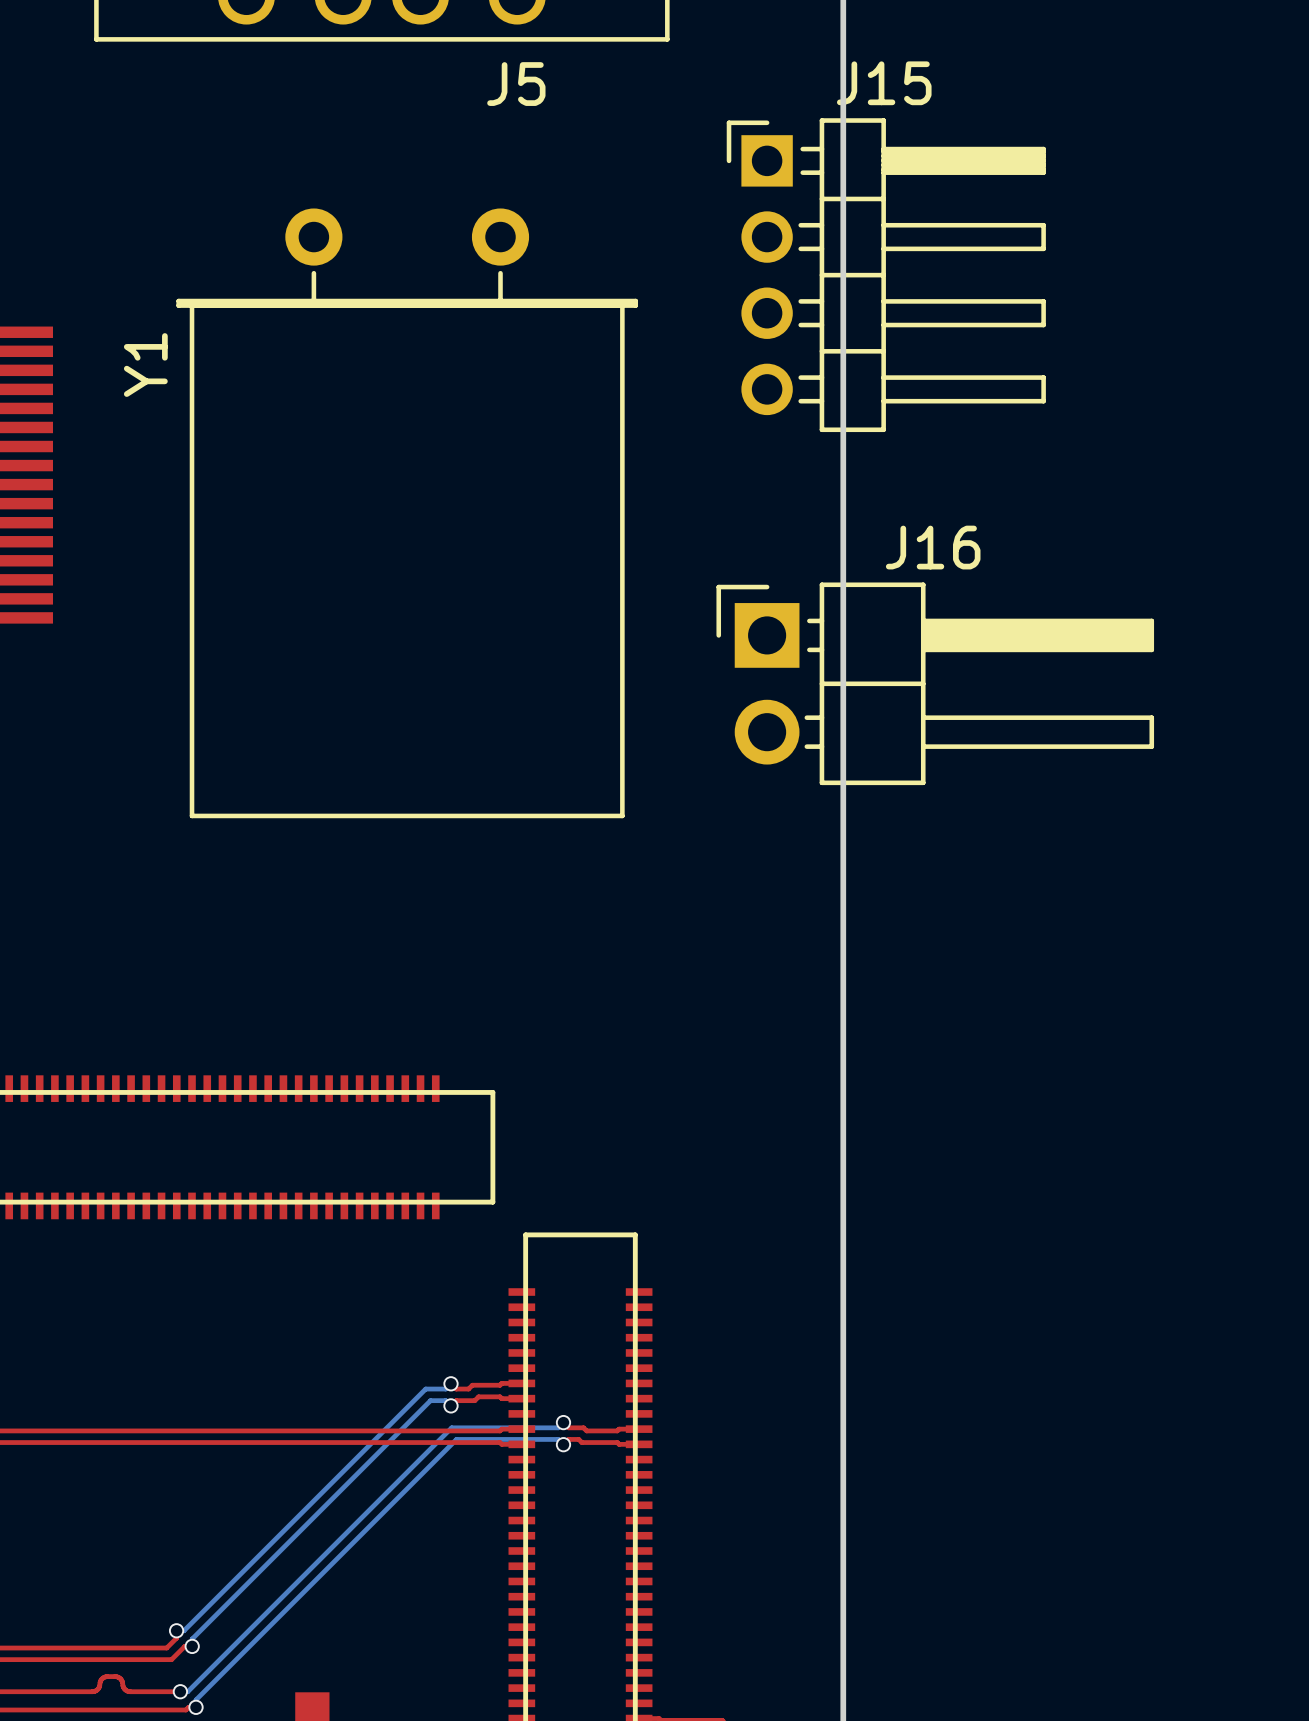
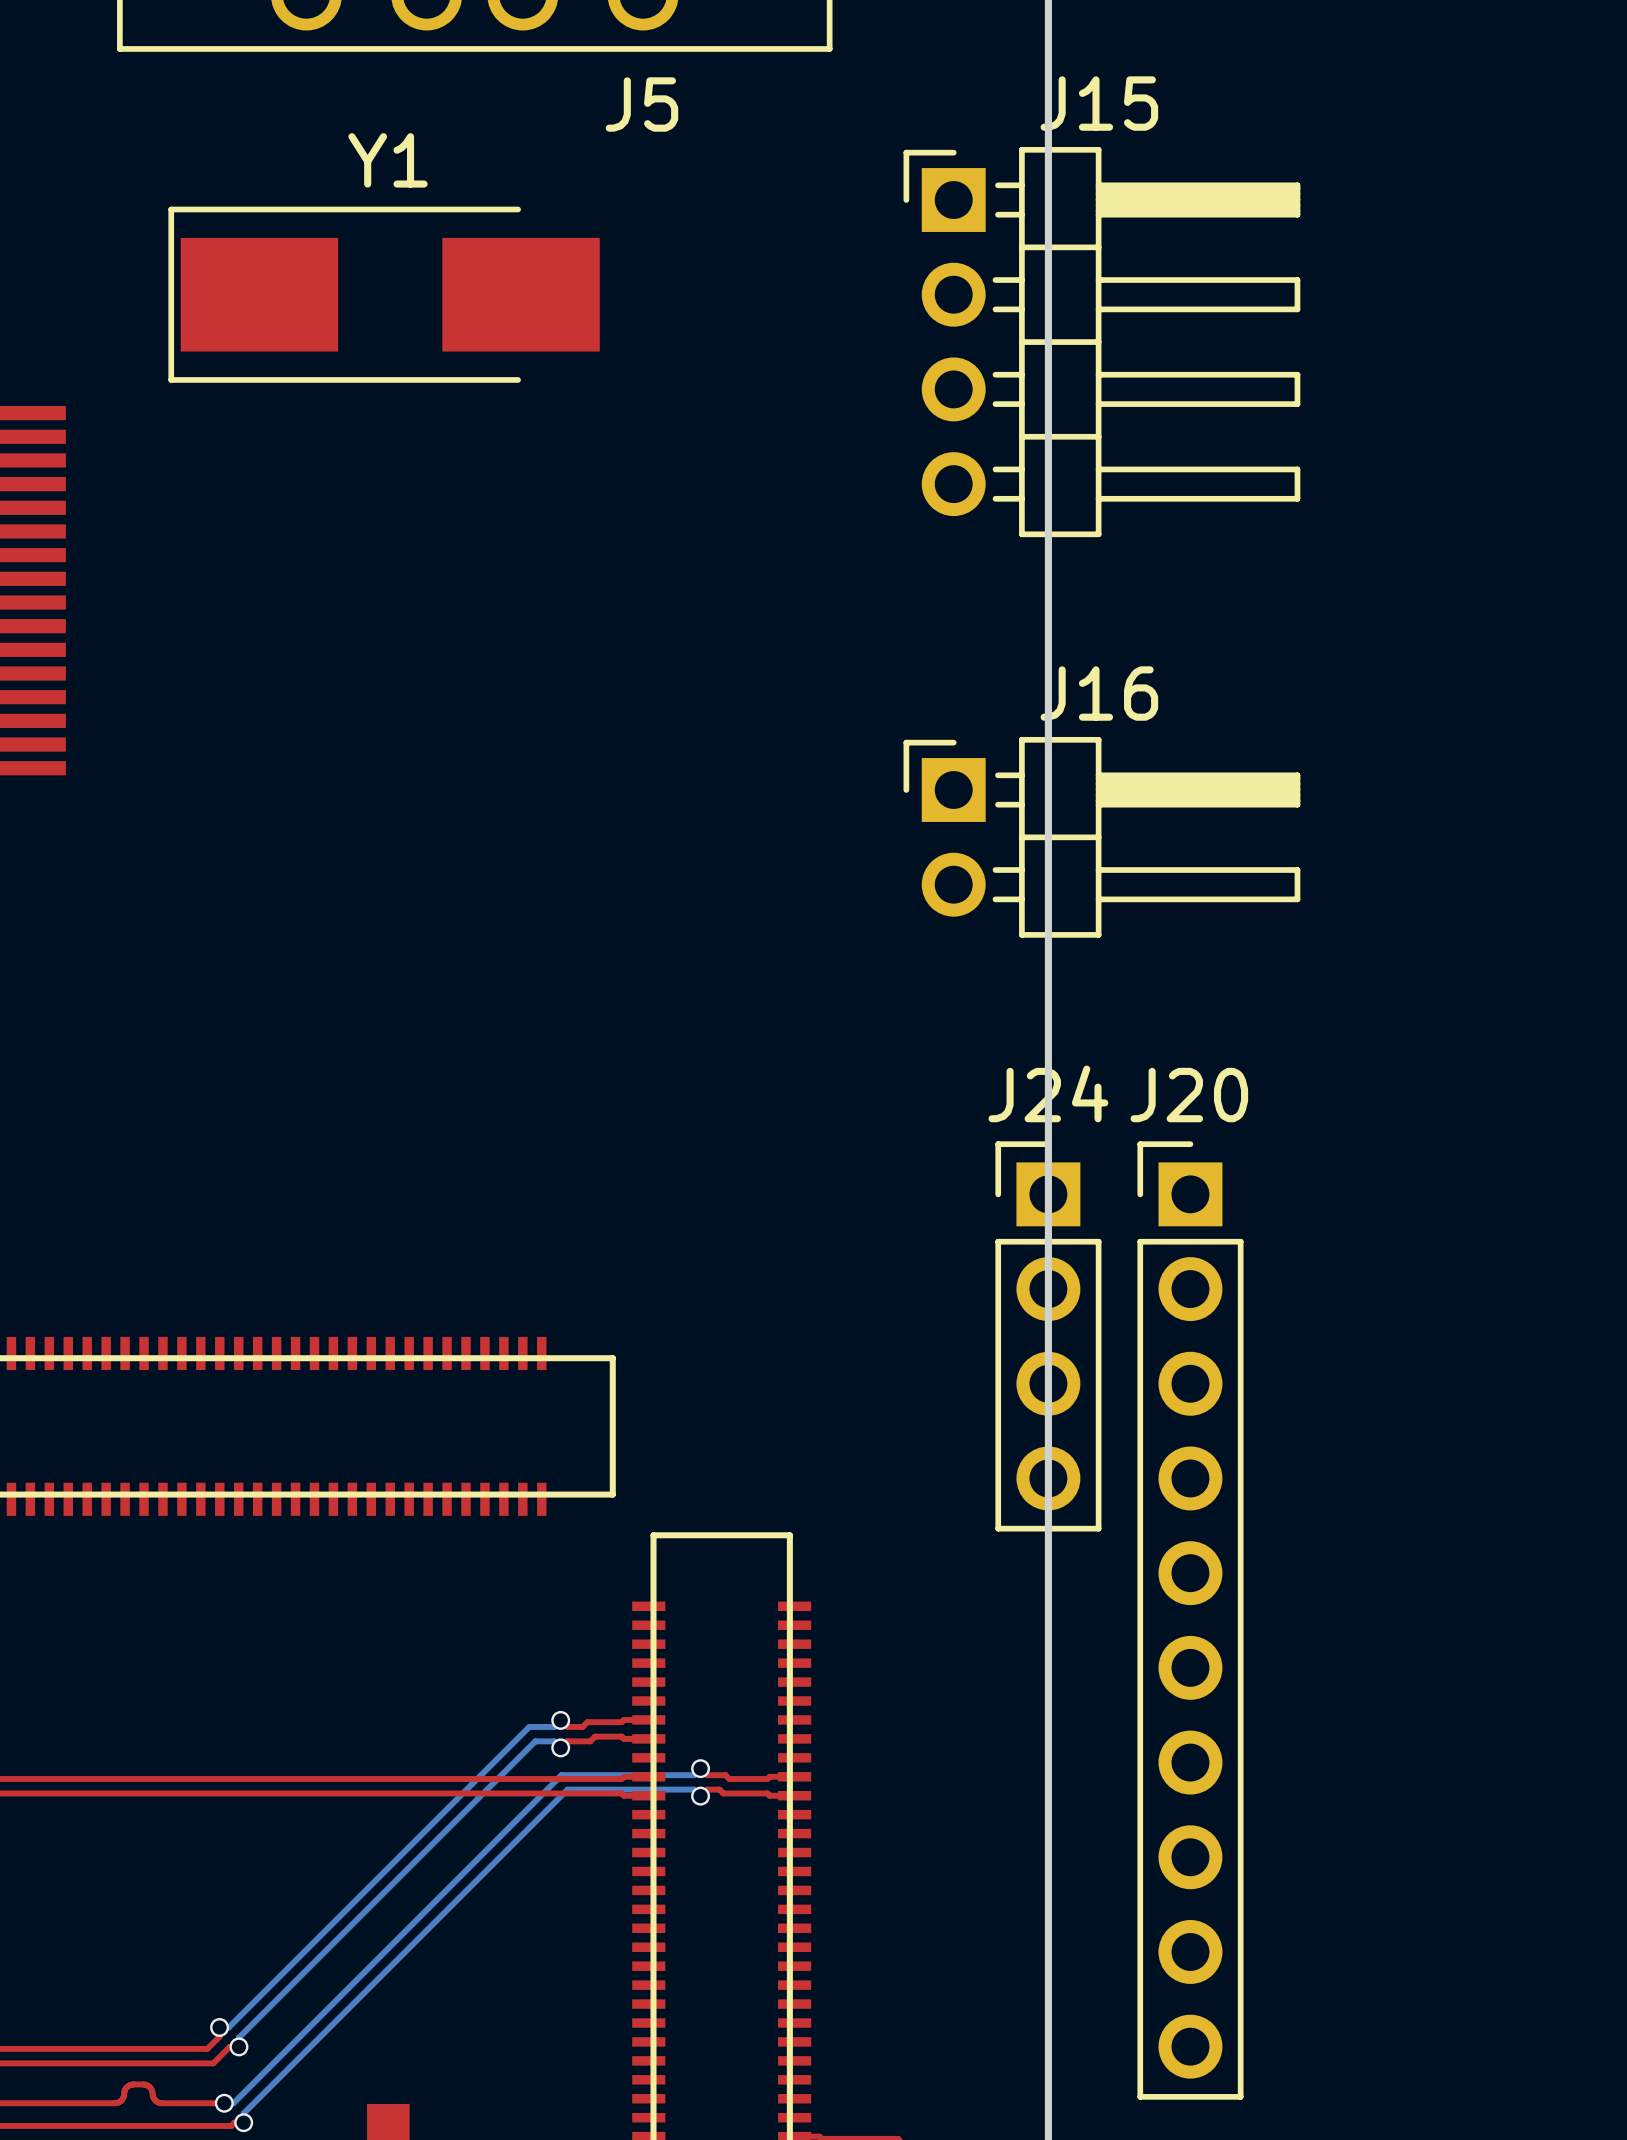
Y1 footprint: [176, 208, 638, 819] -> [168, 206, 600, 383]
Y1 name position: Y1 (145, 365) -> Y1 (387, 160)
J16 footprint: [716, 582, 1155, 786] -> [903, 736, 1301, 938]
J24: none -> (1048, 1336)
J20: none -> (1190, 1620)

